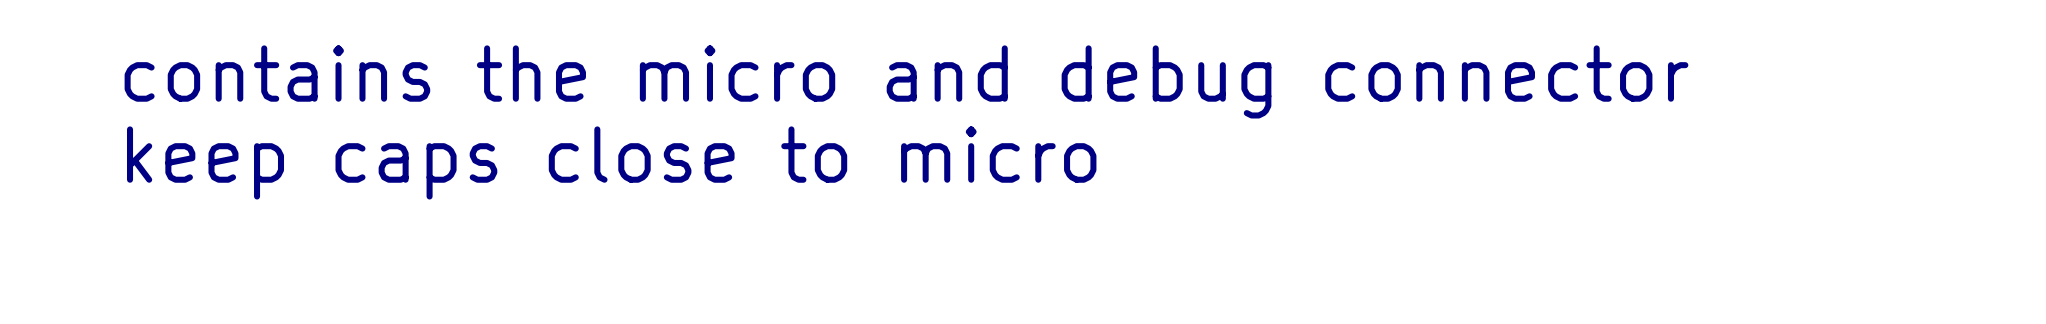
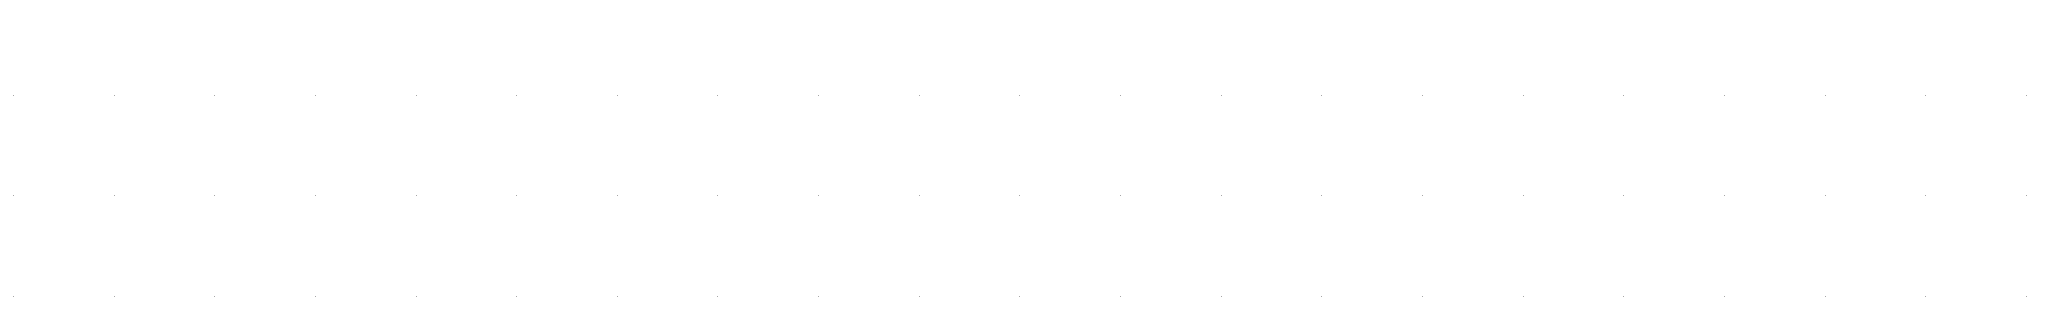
text: contains the micro and debug connector (906, 81) -> none
text: keep caps close to micro (611, 162) -> none

